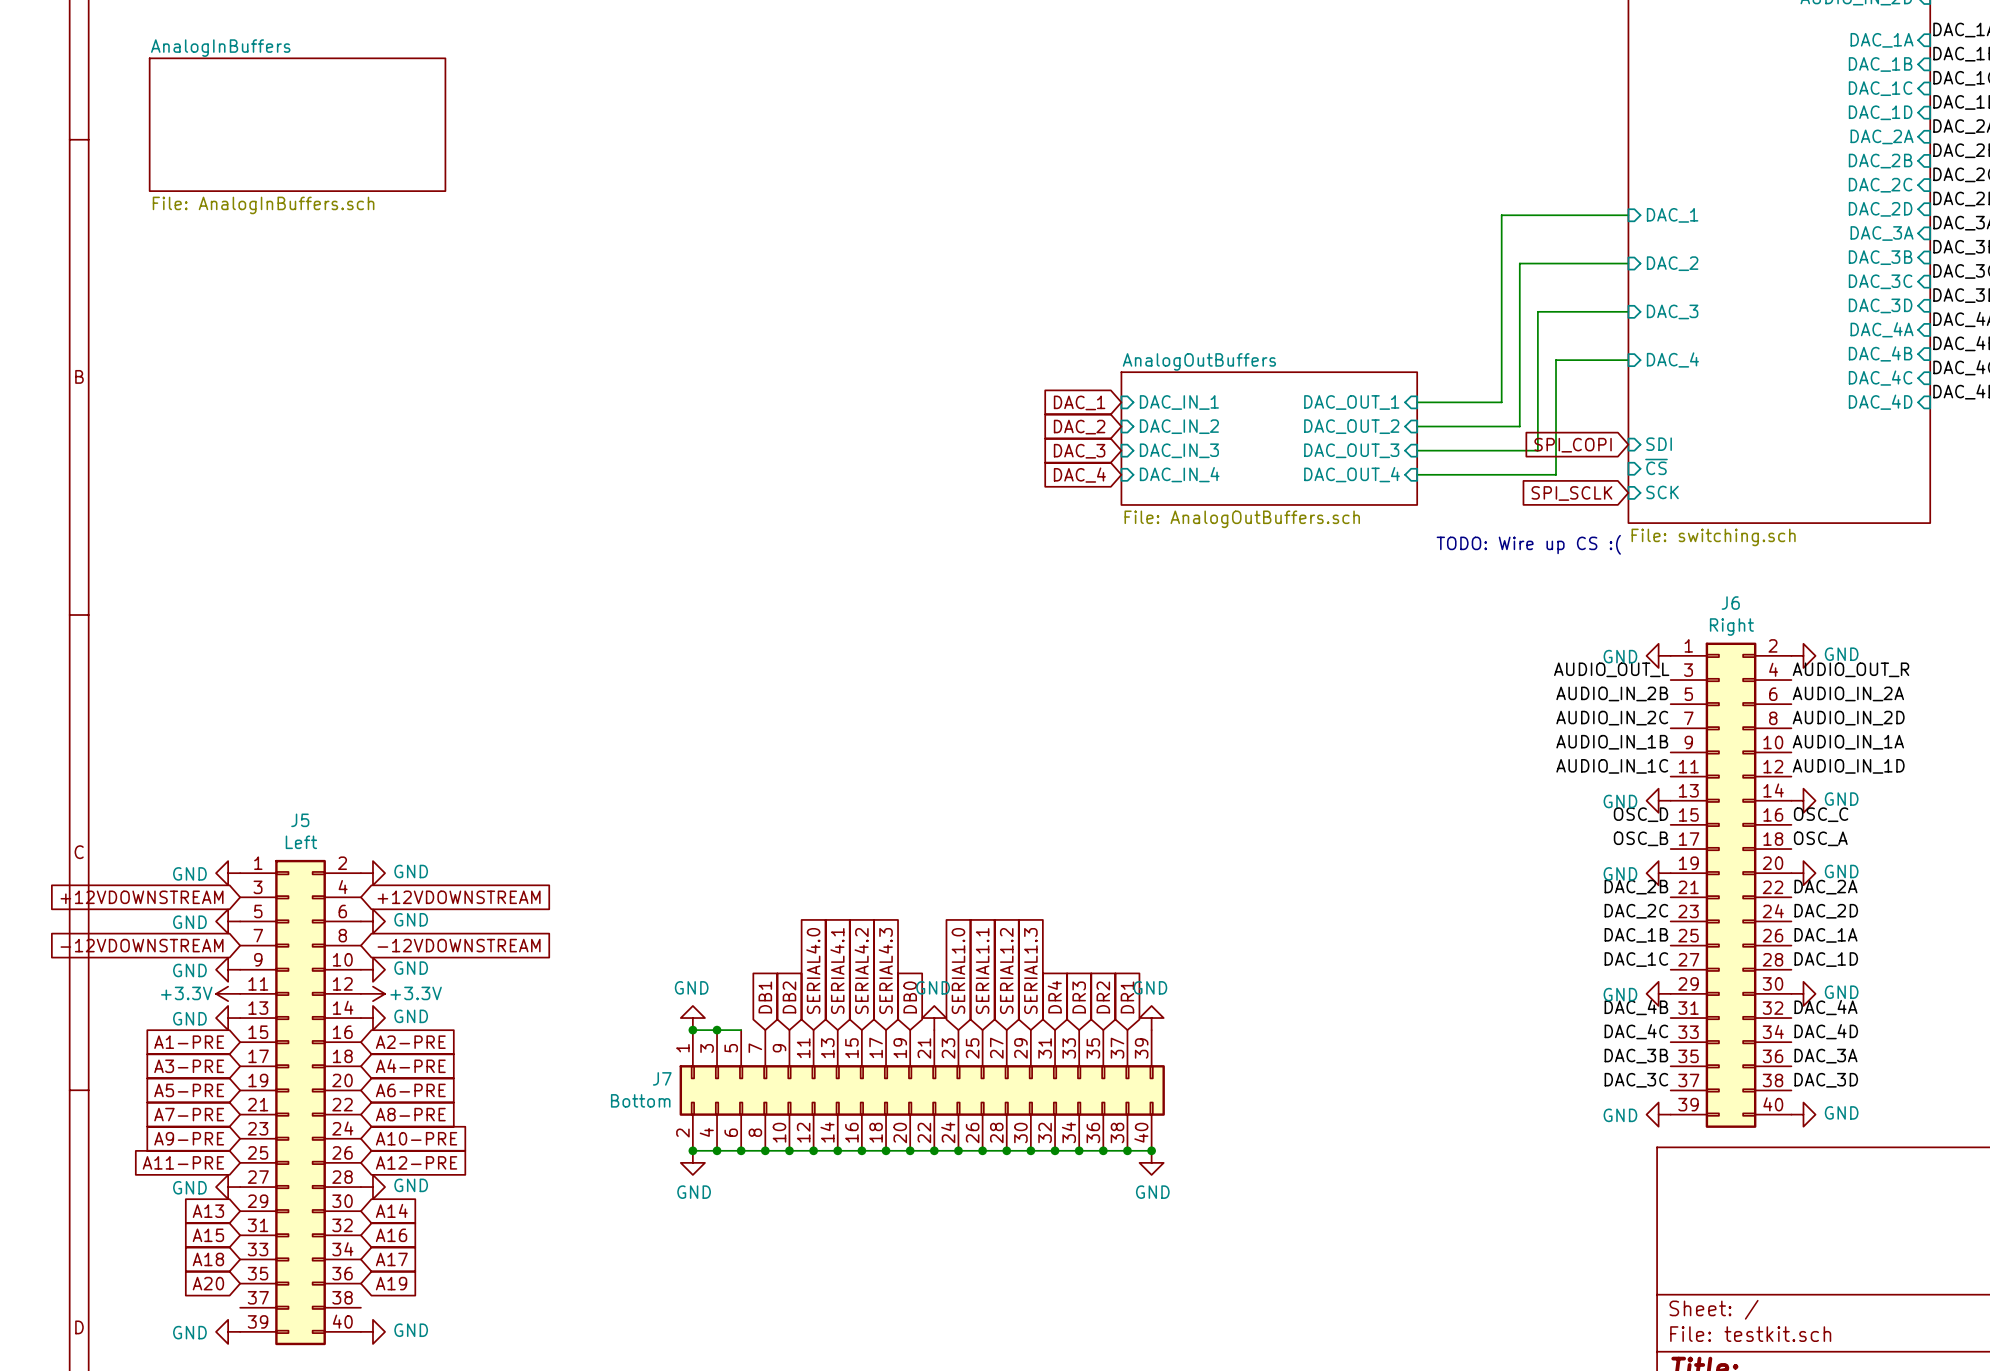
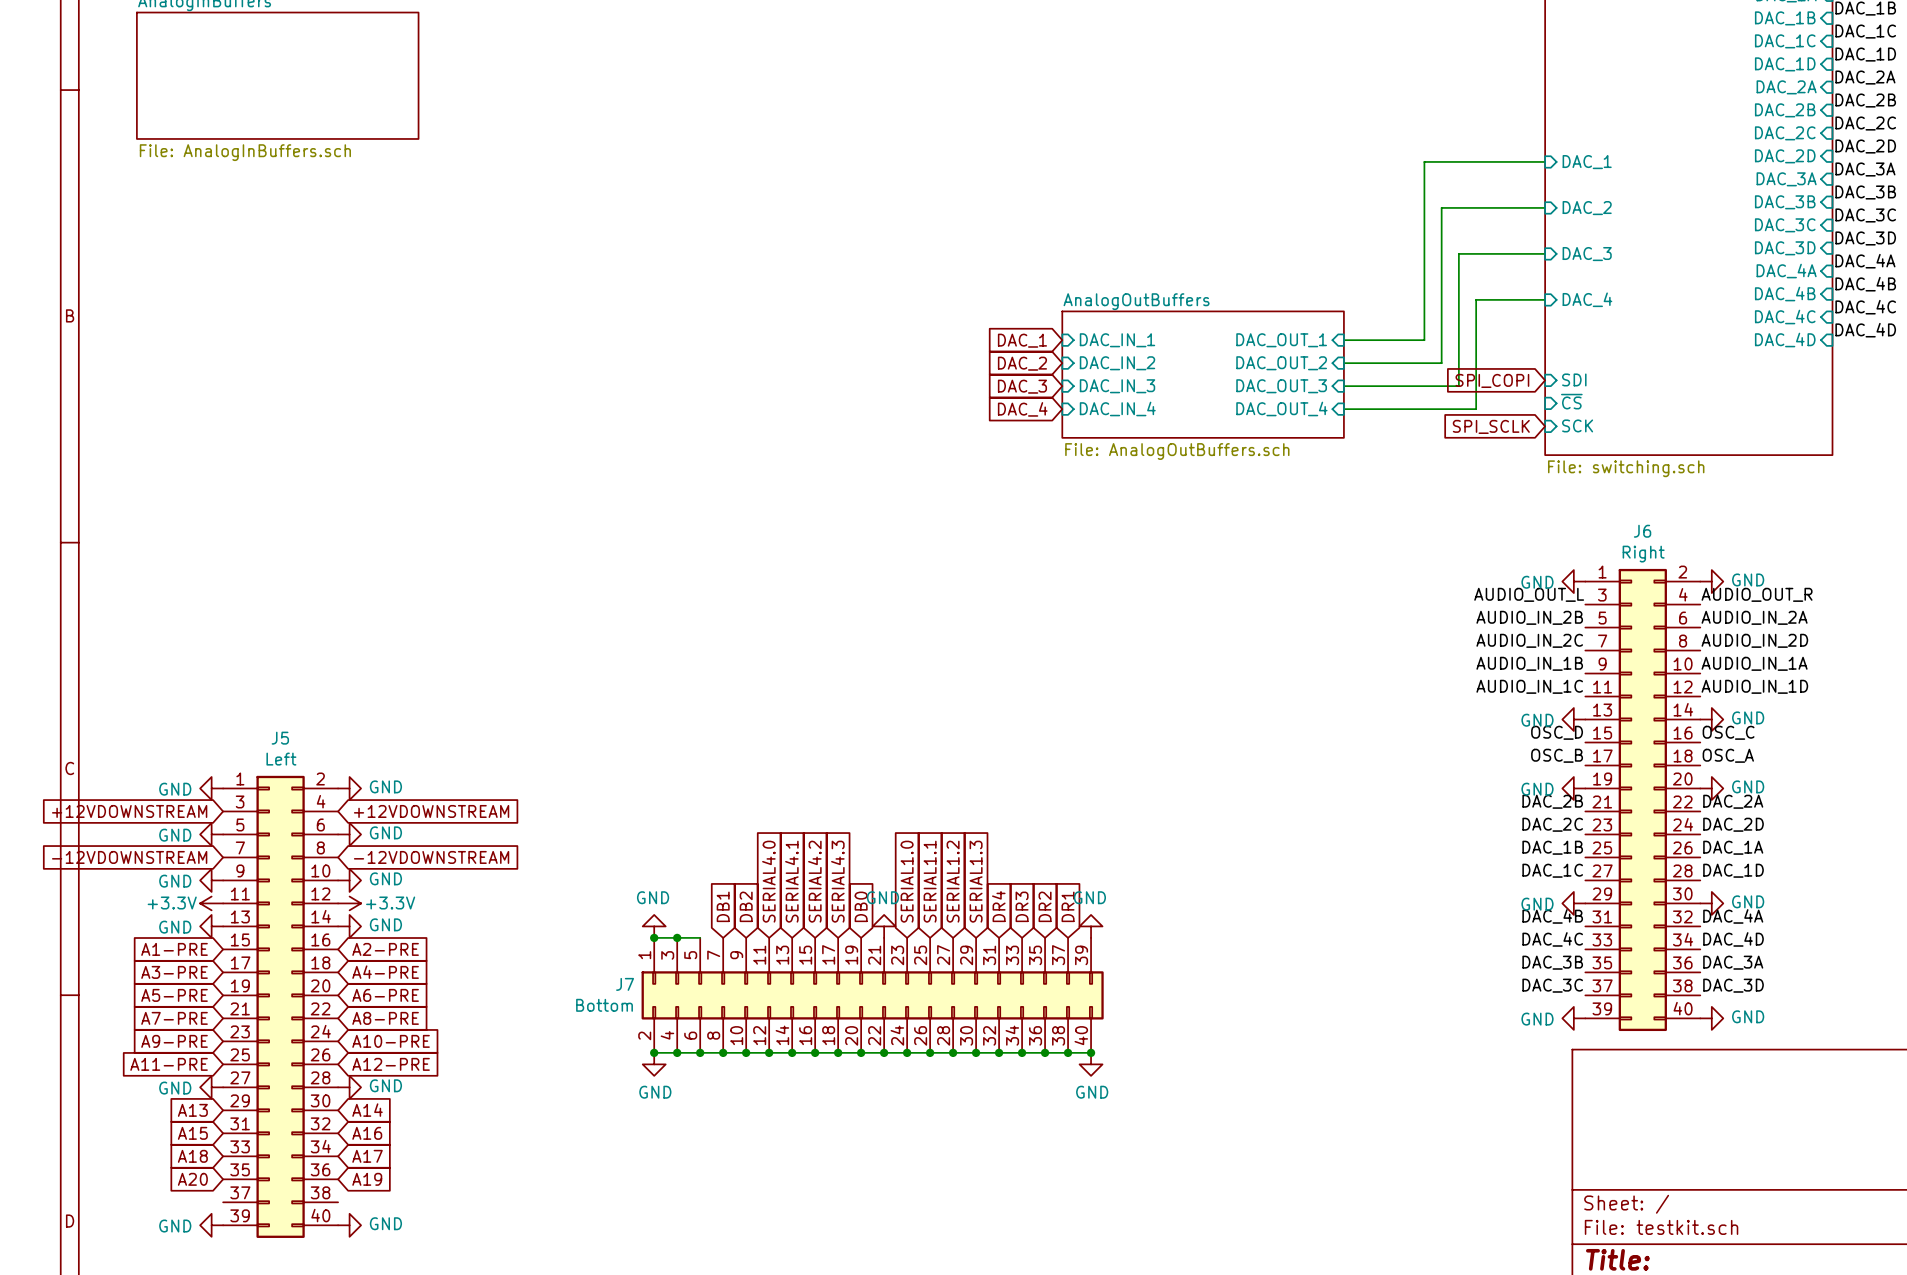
text: TODO: Wire up CS :( (1528, 544) -> none

